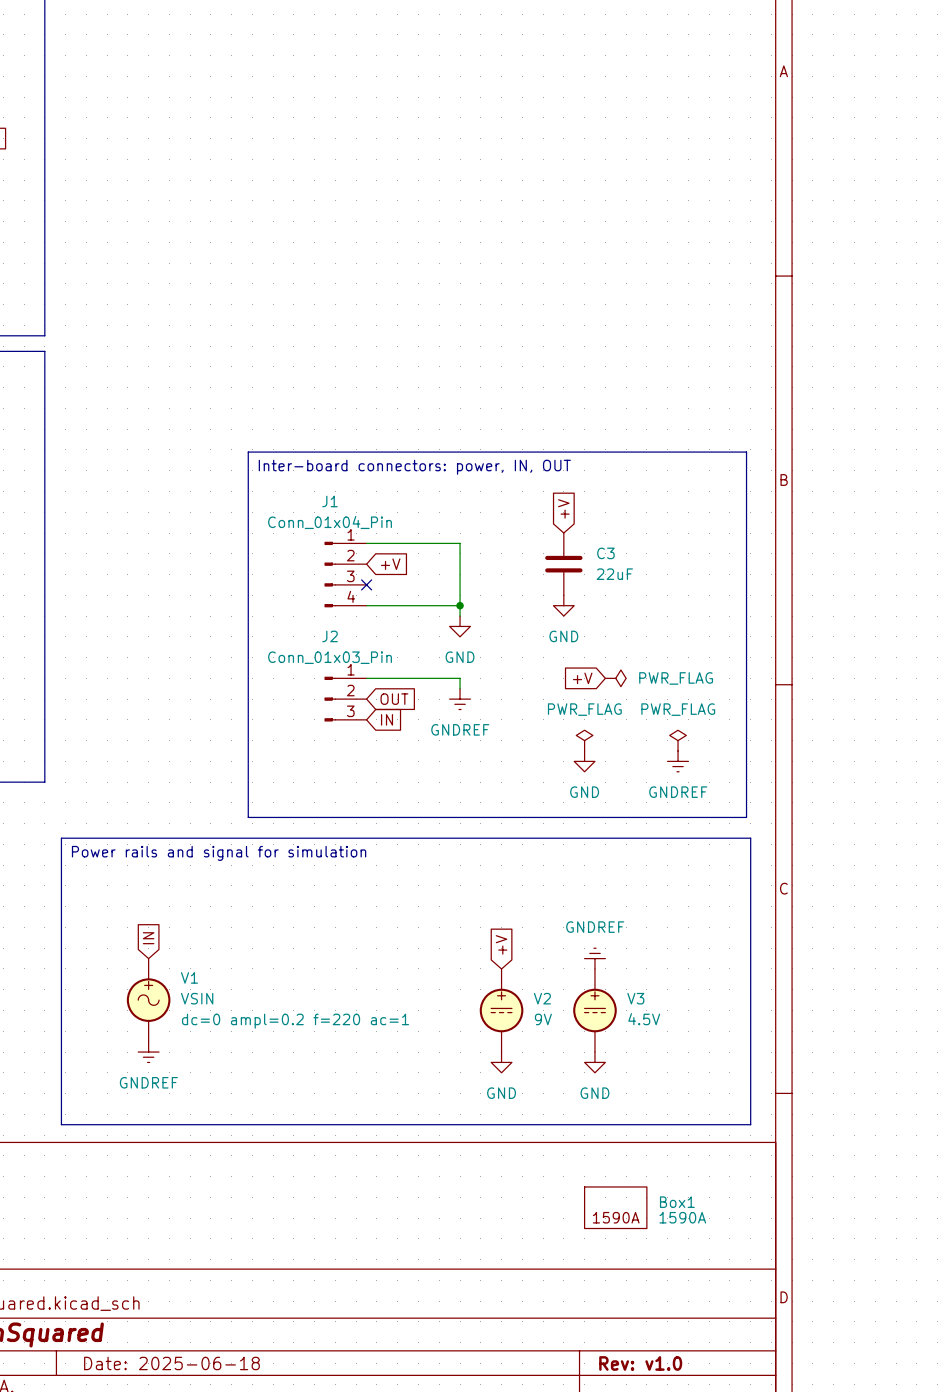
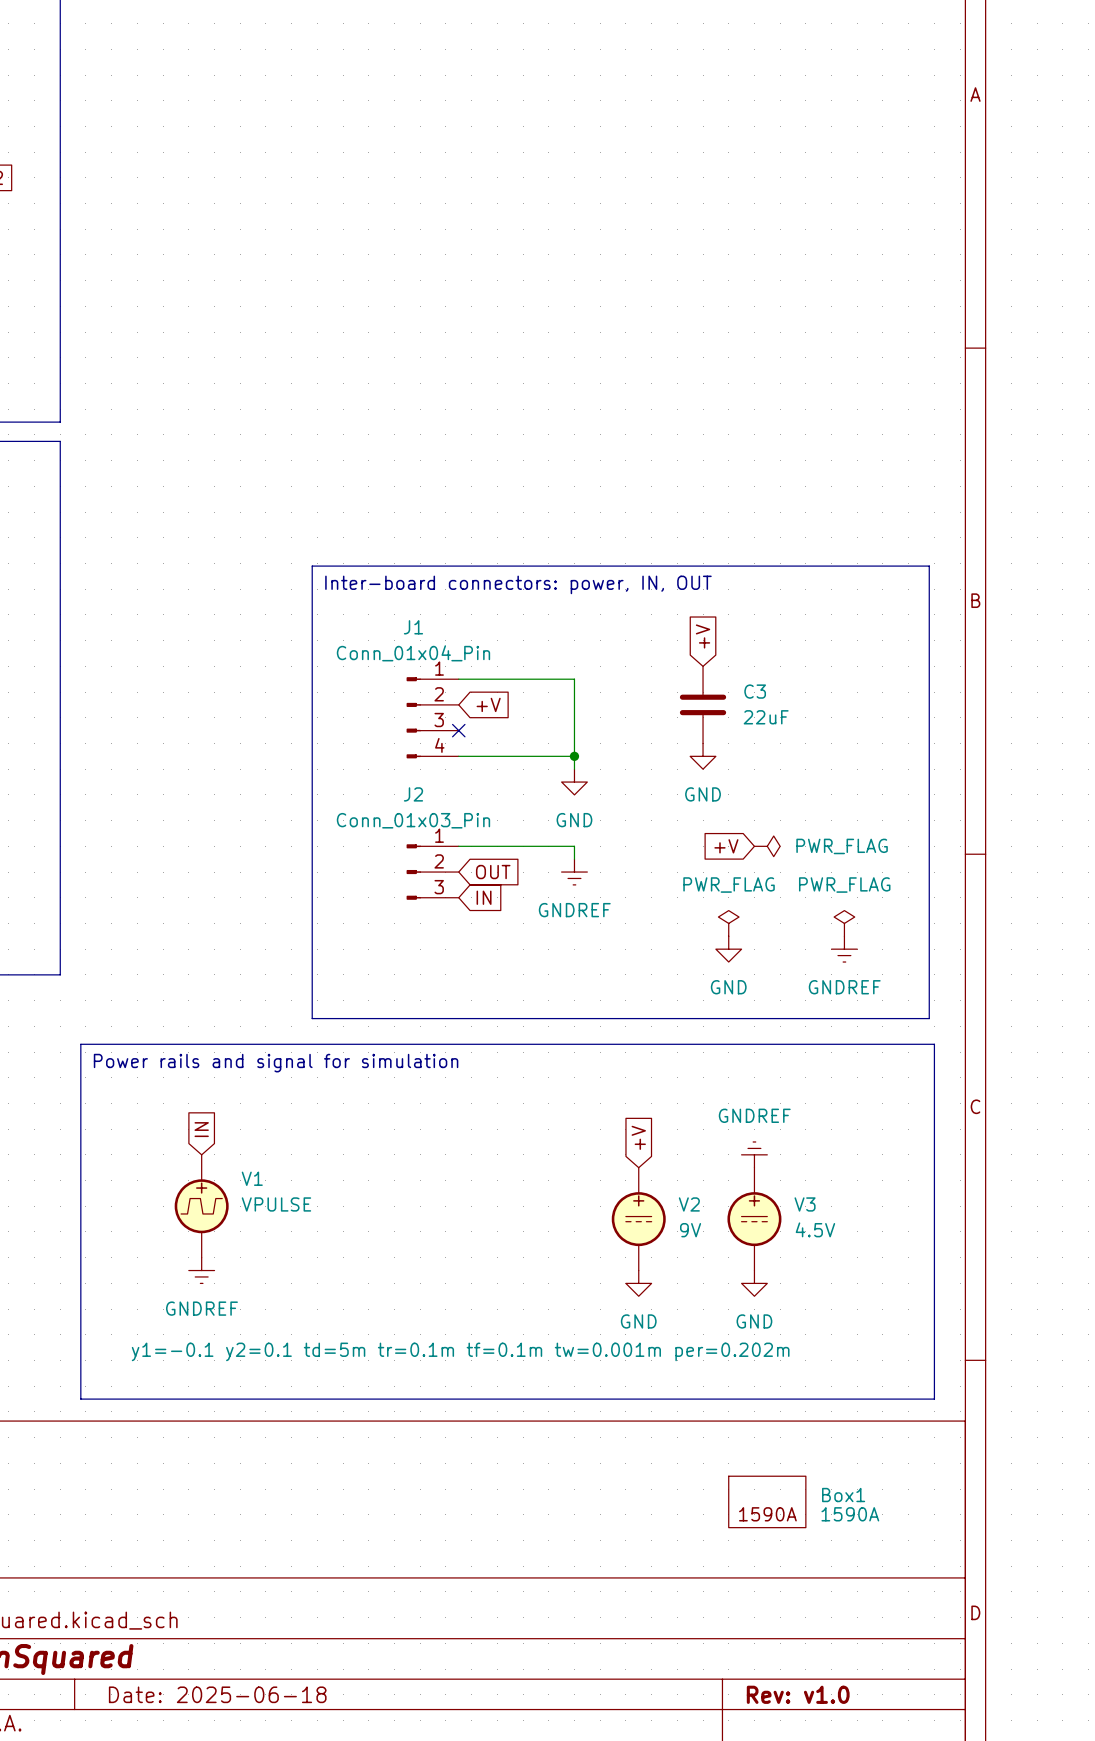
global label position: IN (148, 938) -> IN (201, 1129)
global label position: +V (501, 944) -> +V (638, 1137)
V1 symbol: [126, 958, 171, 1042] -> [174, 1154, 229, 1258]
power symbol position: GNDREF (594, 958) -> GNDREF (754, 1154)
V1 value: VSIN (197, 998) -> VPULSE (276, 1204)
V2 position: (501, 1010) -> (638, 1219)
V3 position: (594, 1010) -> (754, 1219)
V1 text: dc=0 ampl=0.2 f=220 ac=1 (295, 1021) -> y1=-0.1 y2=0.1 td=5m tr=0.1m tf=0.1m tw=0.001m per=0.202m (460, 1351)
power symbol position: GNDREF (148, 1052) -> GNDREF (201, 1270)
power symbol position: GND (501, 1062) -> GND (638, 1283)
power symbol position: GND (594, 1062) -> GND (754, 1283)

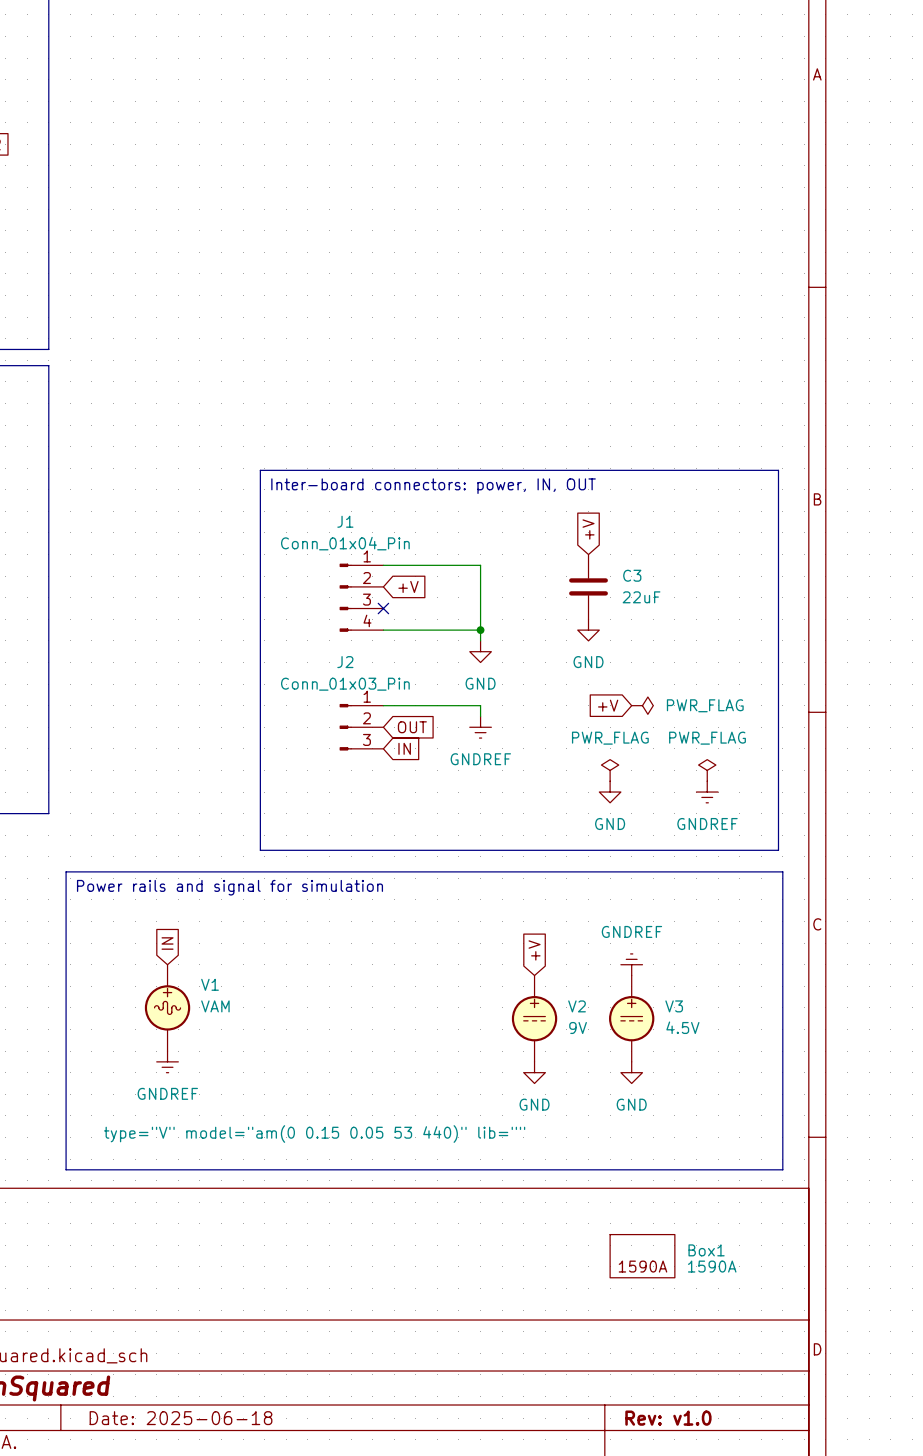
V1 symbol: [174, 1154, 229, 1258] -> [144, 964, 191, 1052]
V1 value: VPULSE (276, 1204) -> VAM (215, 1006)
V1 text: y1=-0.1 y2=0.1 td=5m tr=0.1m tf=0.1m tw=0.001m per=0.202m (460, 1351) -> type="V" model="am(0 0.15 0.05 53 440)" lib="" (314, 1134)

